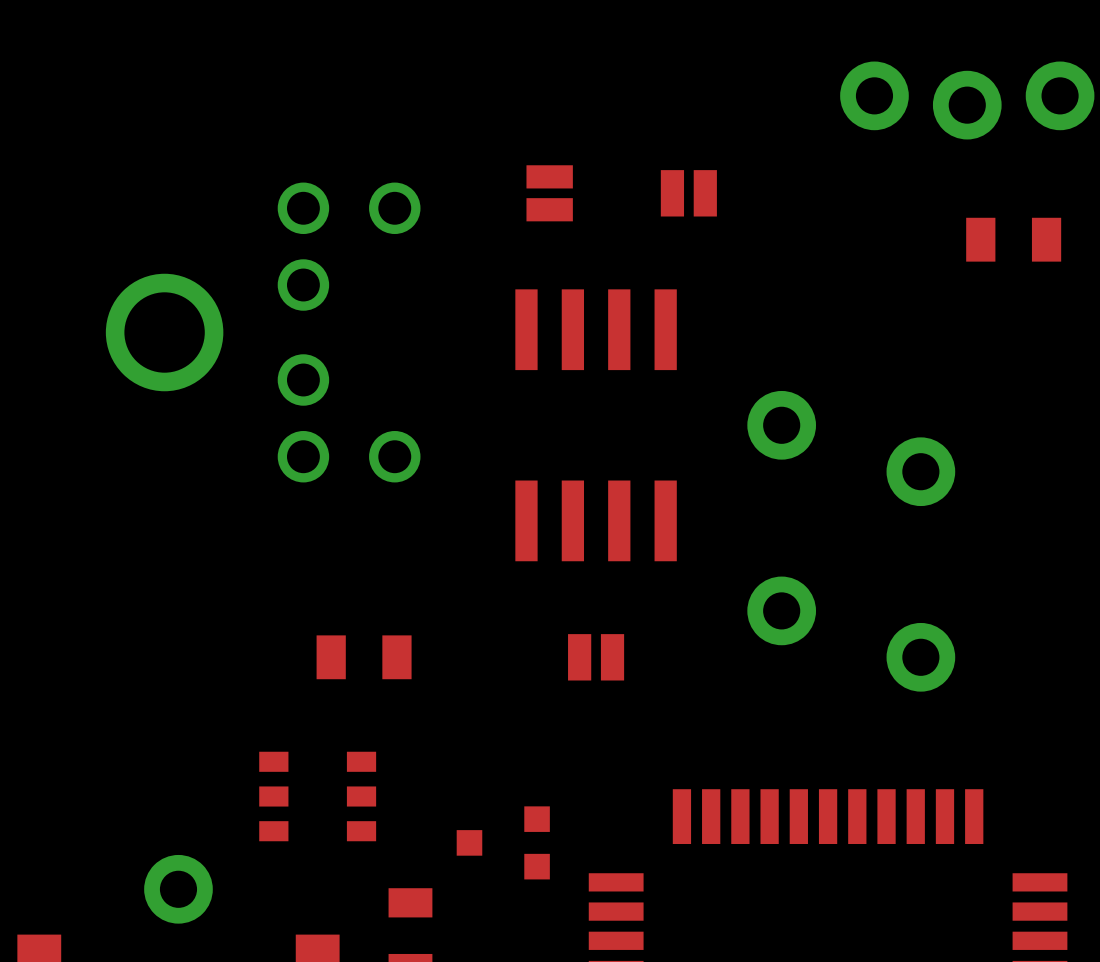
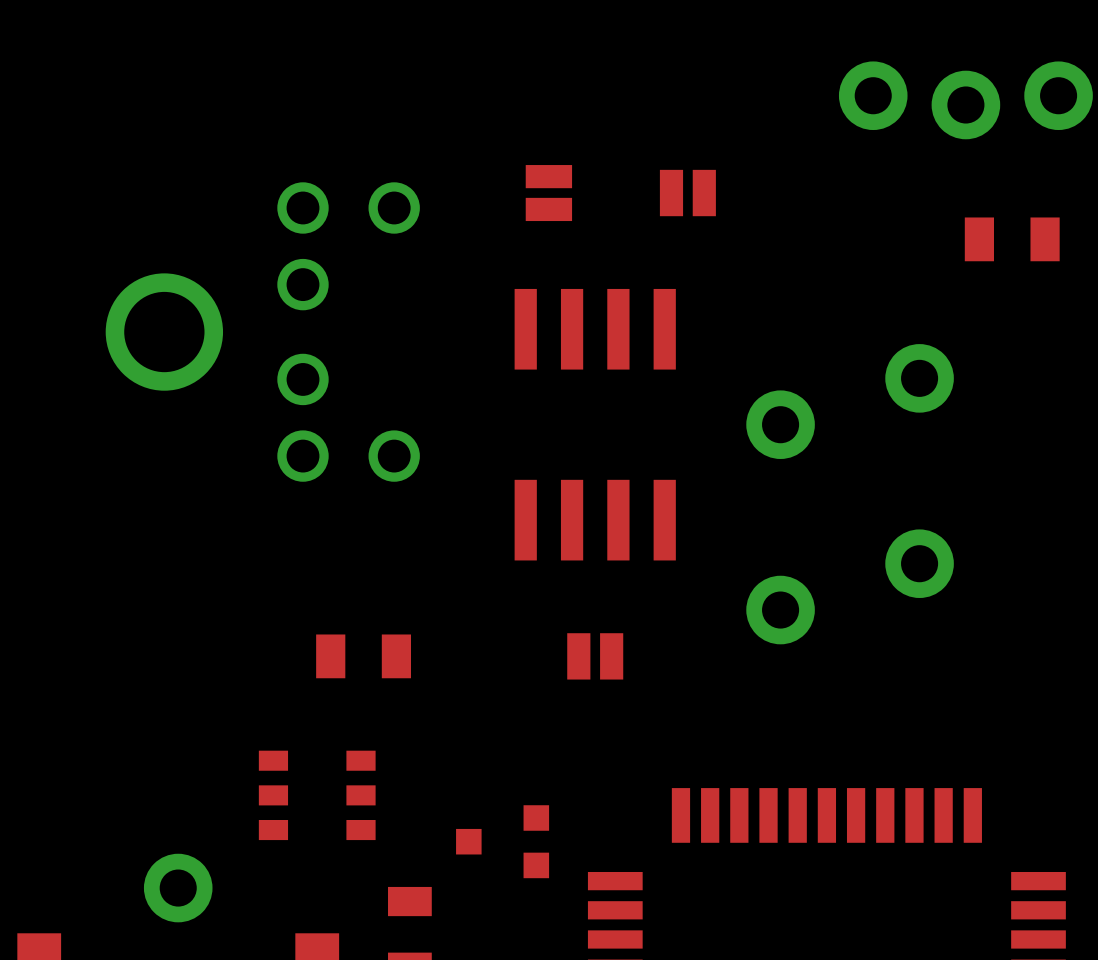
part: none -> (919, 378)
part: (920, 471) -> none
part: none -> (919, 563)
part: (920, 657) -> none

